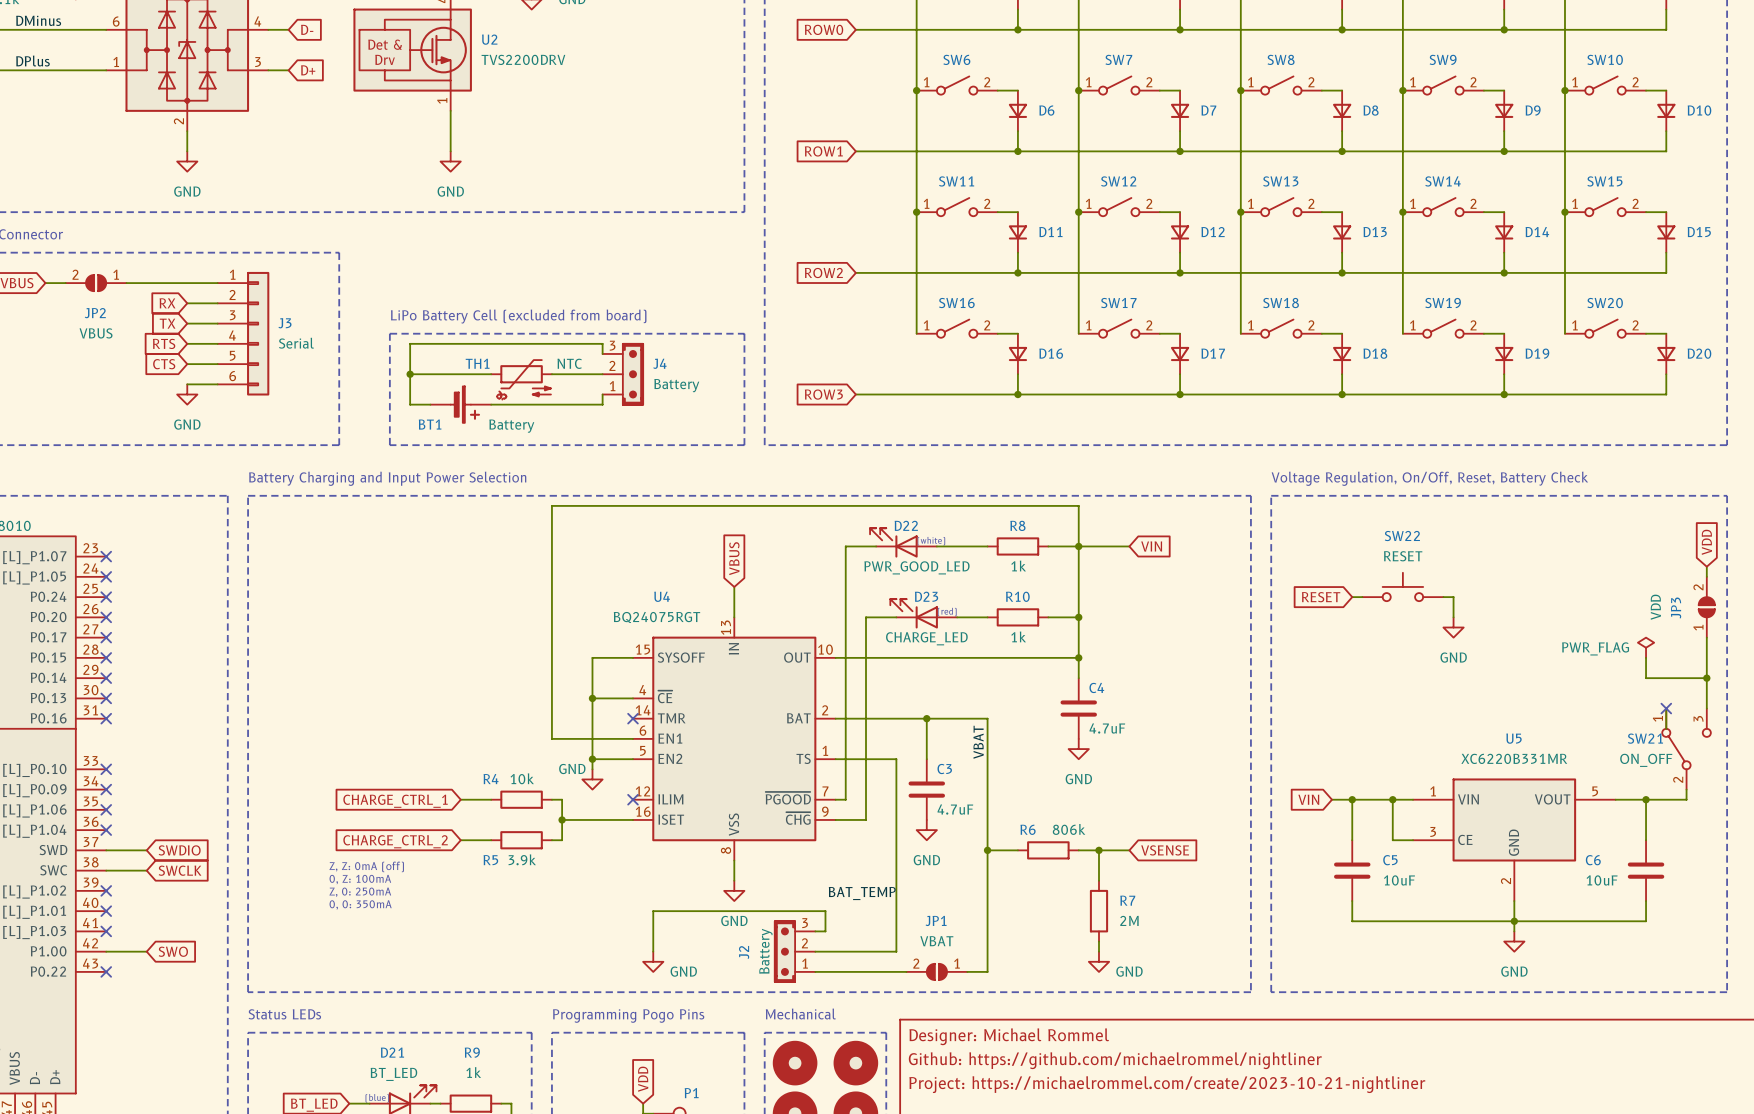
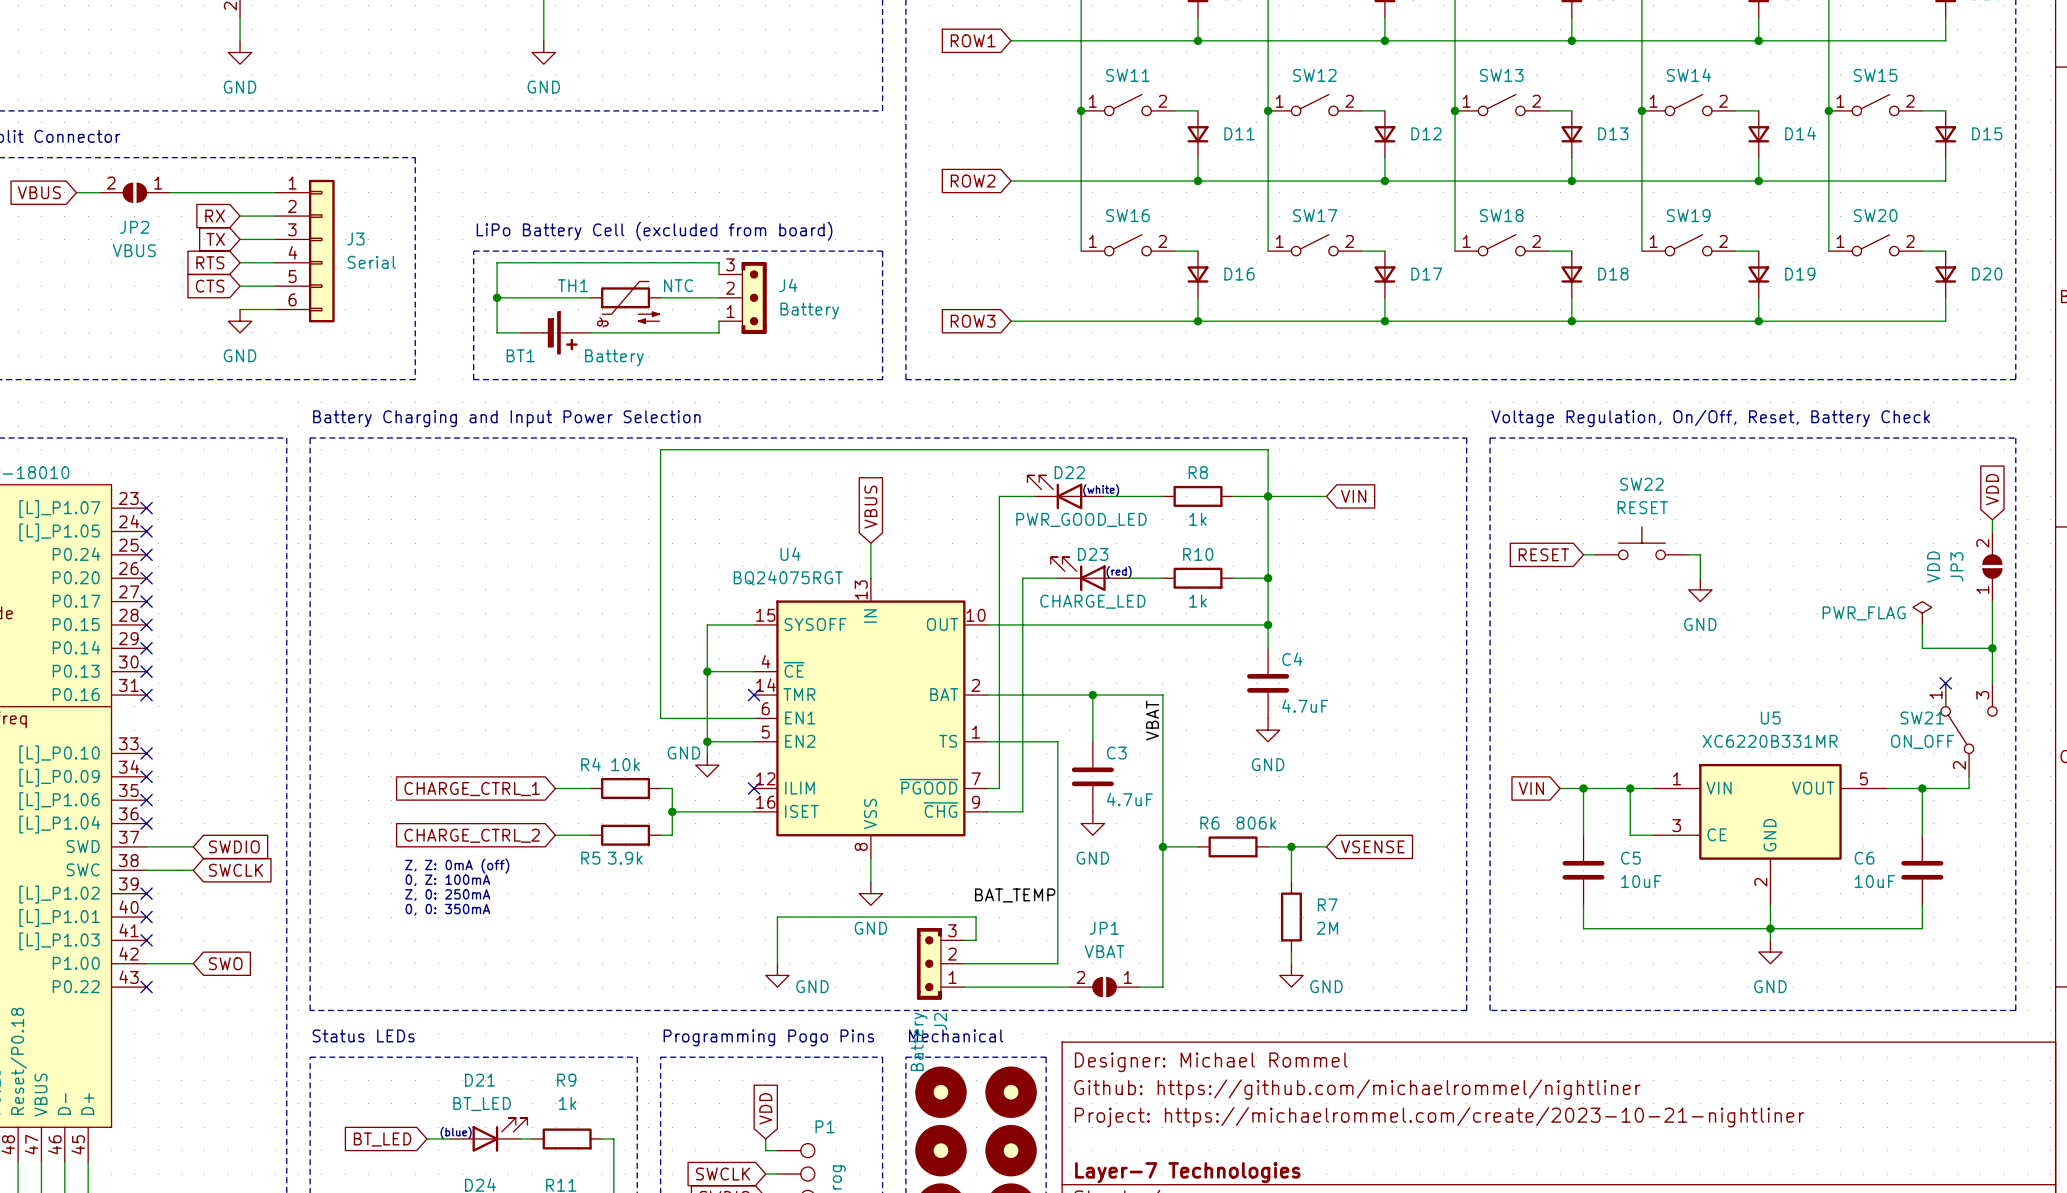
J2 value position: Battery (765, 951) -> Battery (919, 1041)
J2 name position: J2 (744, 952) -> J2 (940, 1021)

